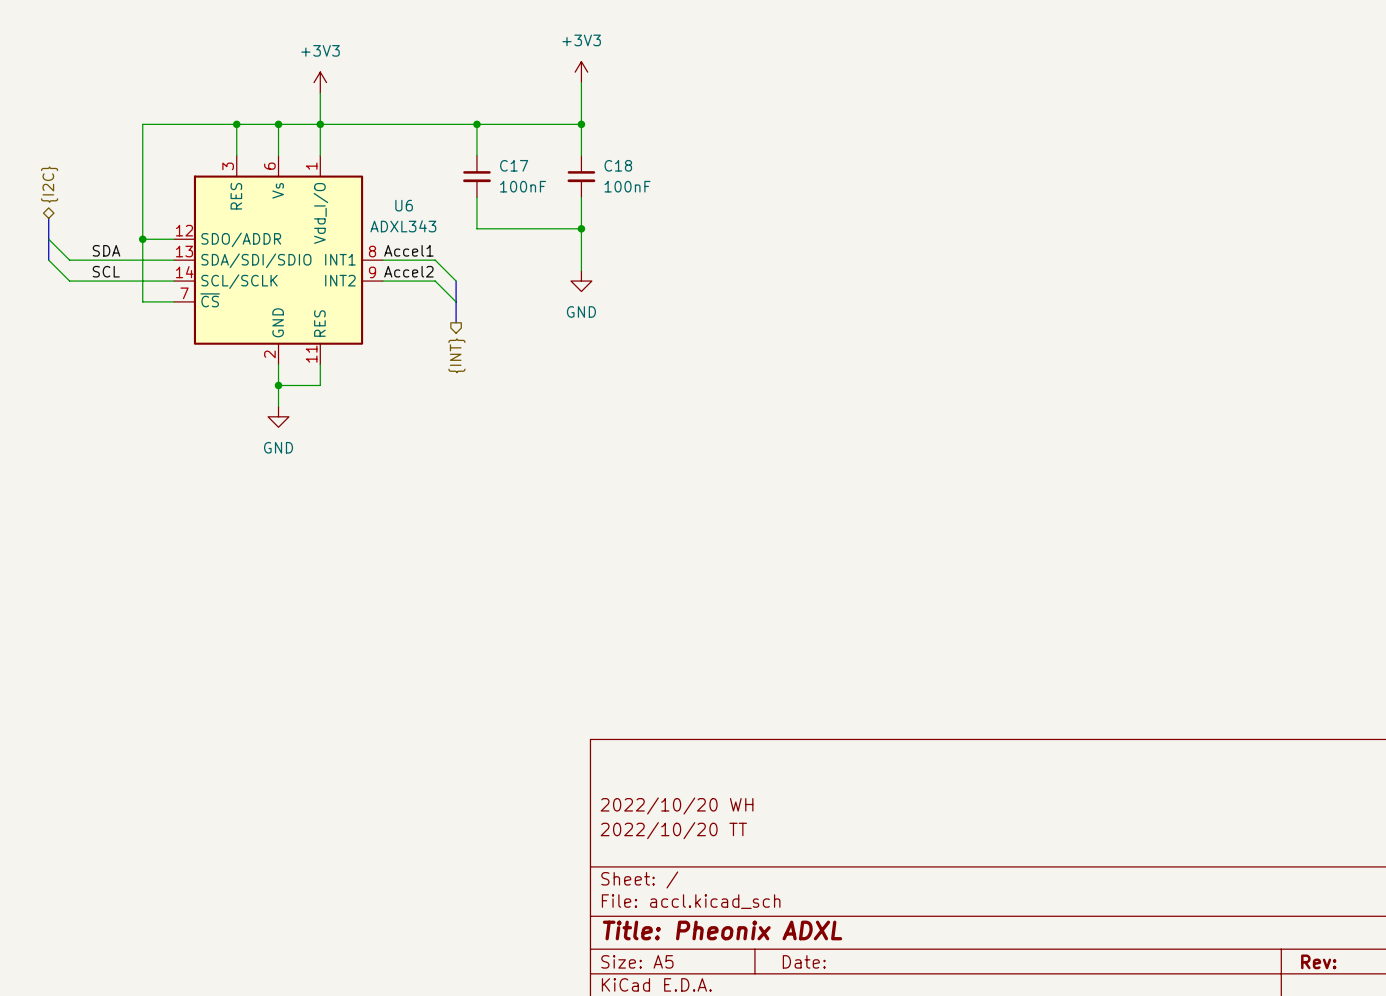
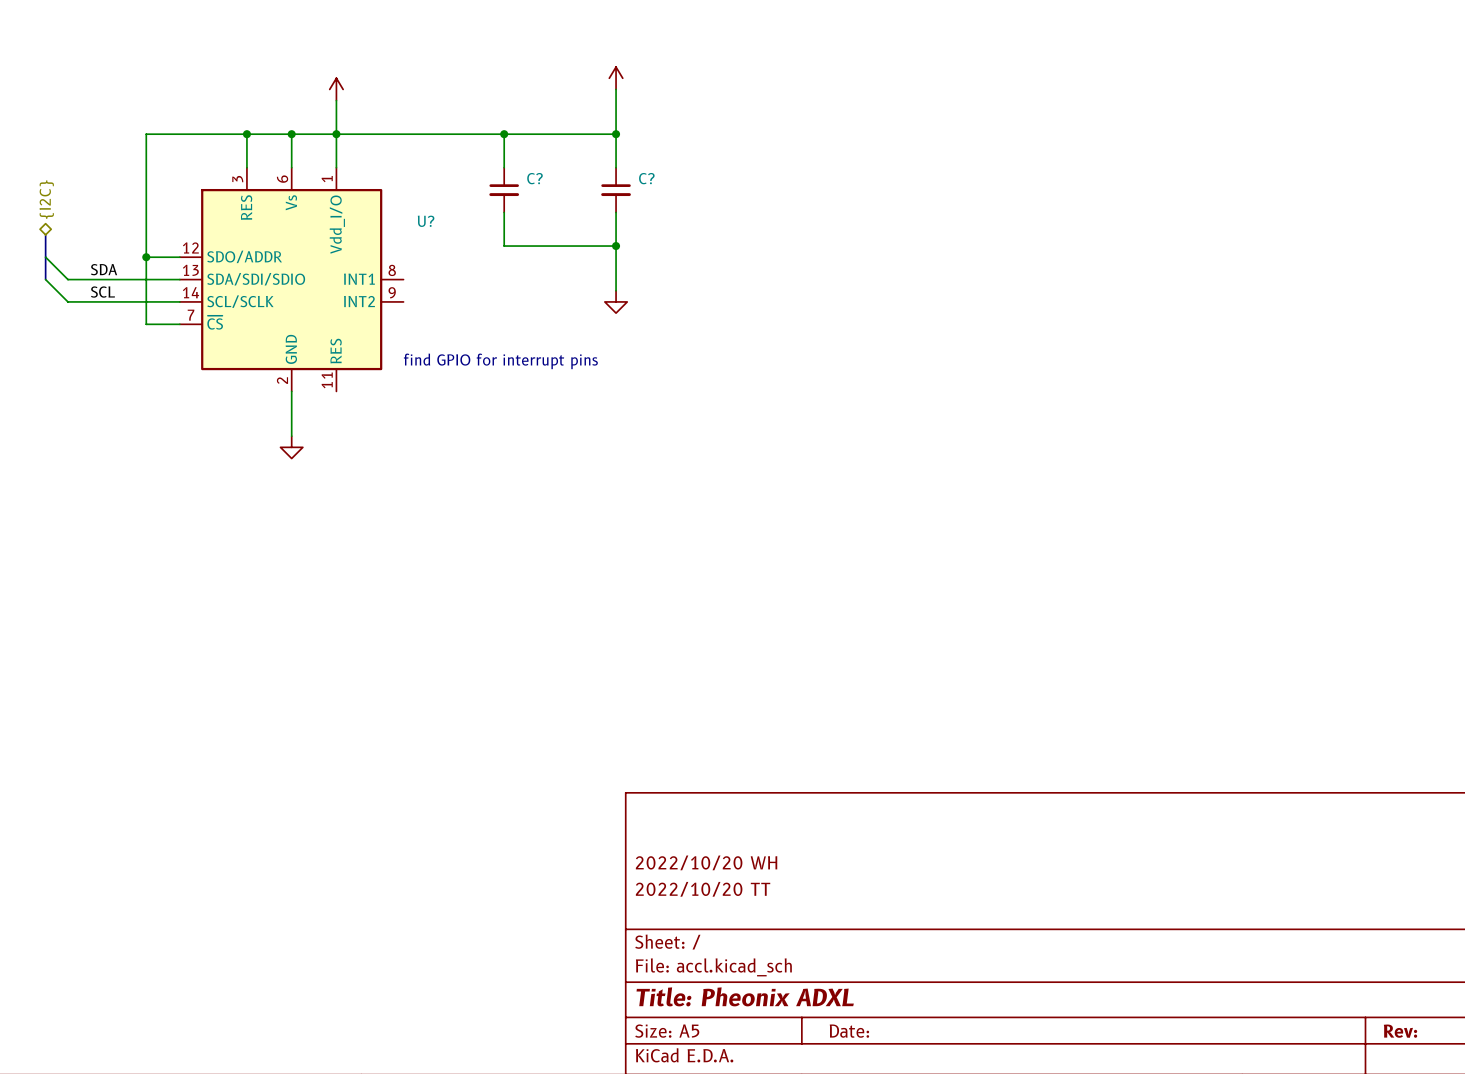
power symbol text: +3V3 (581, 40) -> none
power symbol text: +3V3 (320, 50) -> none
C17 name: C17 (514, 165) -> C? (534, 178)
C18 name: C18 (618, 165) -> C? (646, 178)
C17 value: 100nF (523, 186) -> none
C18 value: 100nF (627, 186) -> none
U6 name: U6 (404, 205) -> U? (426, 221)
U6 value: ADXL343 (403, 226) -> none
label: Accel1 (408, 250) -> none
wire: (382, 260) (435, 260) (456, 281) -> none
label: Accel2 (408, 271) -> none
wire: (382, 281) (435, 281) (456, 301) -> none
bus: (456, 281) (456, 322) -> none
power symbol text: GND (581, 311) -> none
text: none -> find GPIO for interrupt pins (500, 361)
hierarchical label: {INT} (456, 355) -> none
wire: (320, 364) (320, 385) (278, 385) -> none
junction: (278, 385) -> none
power symbol text: GND (278, 447) -> none

